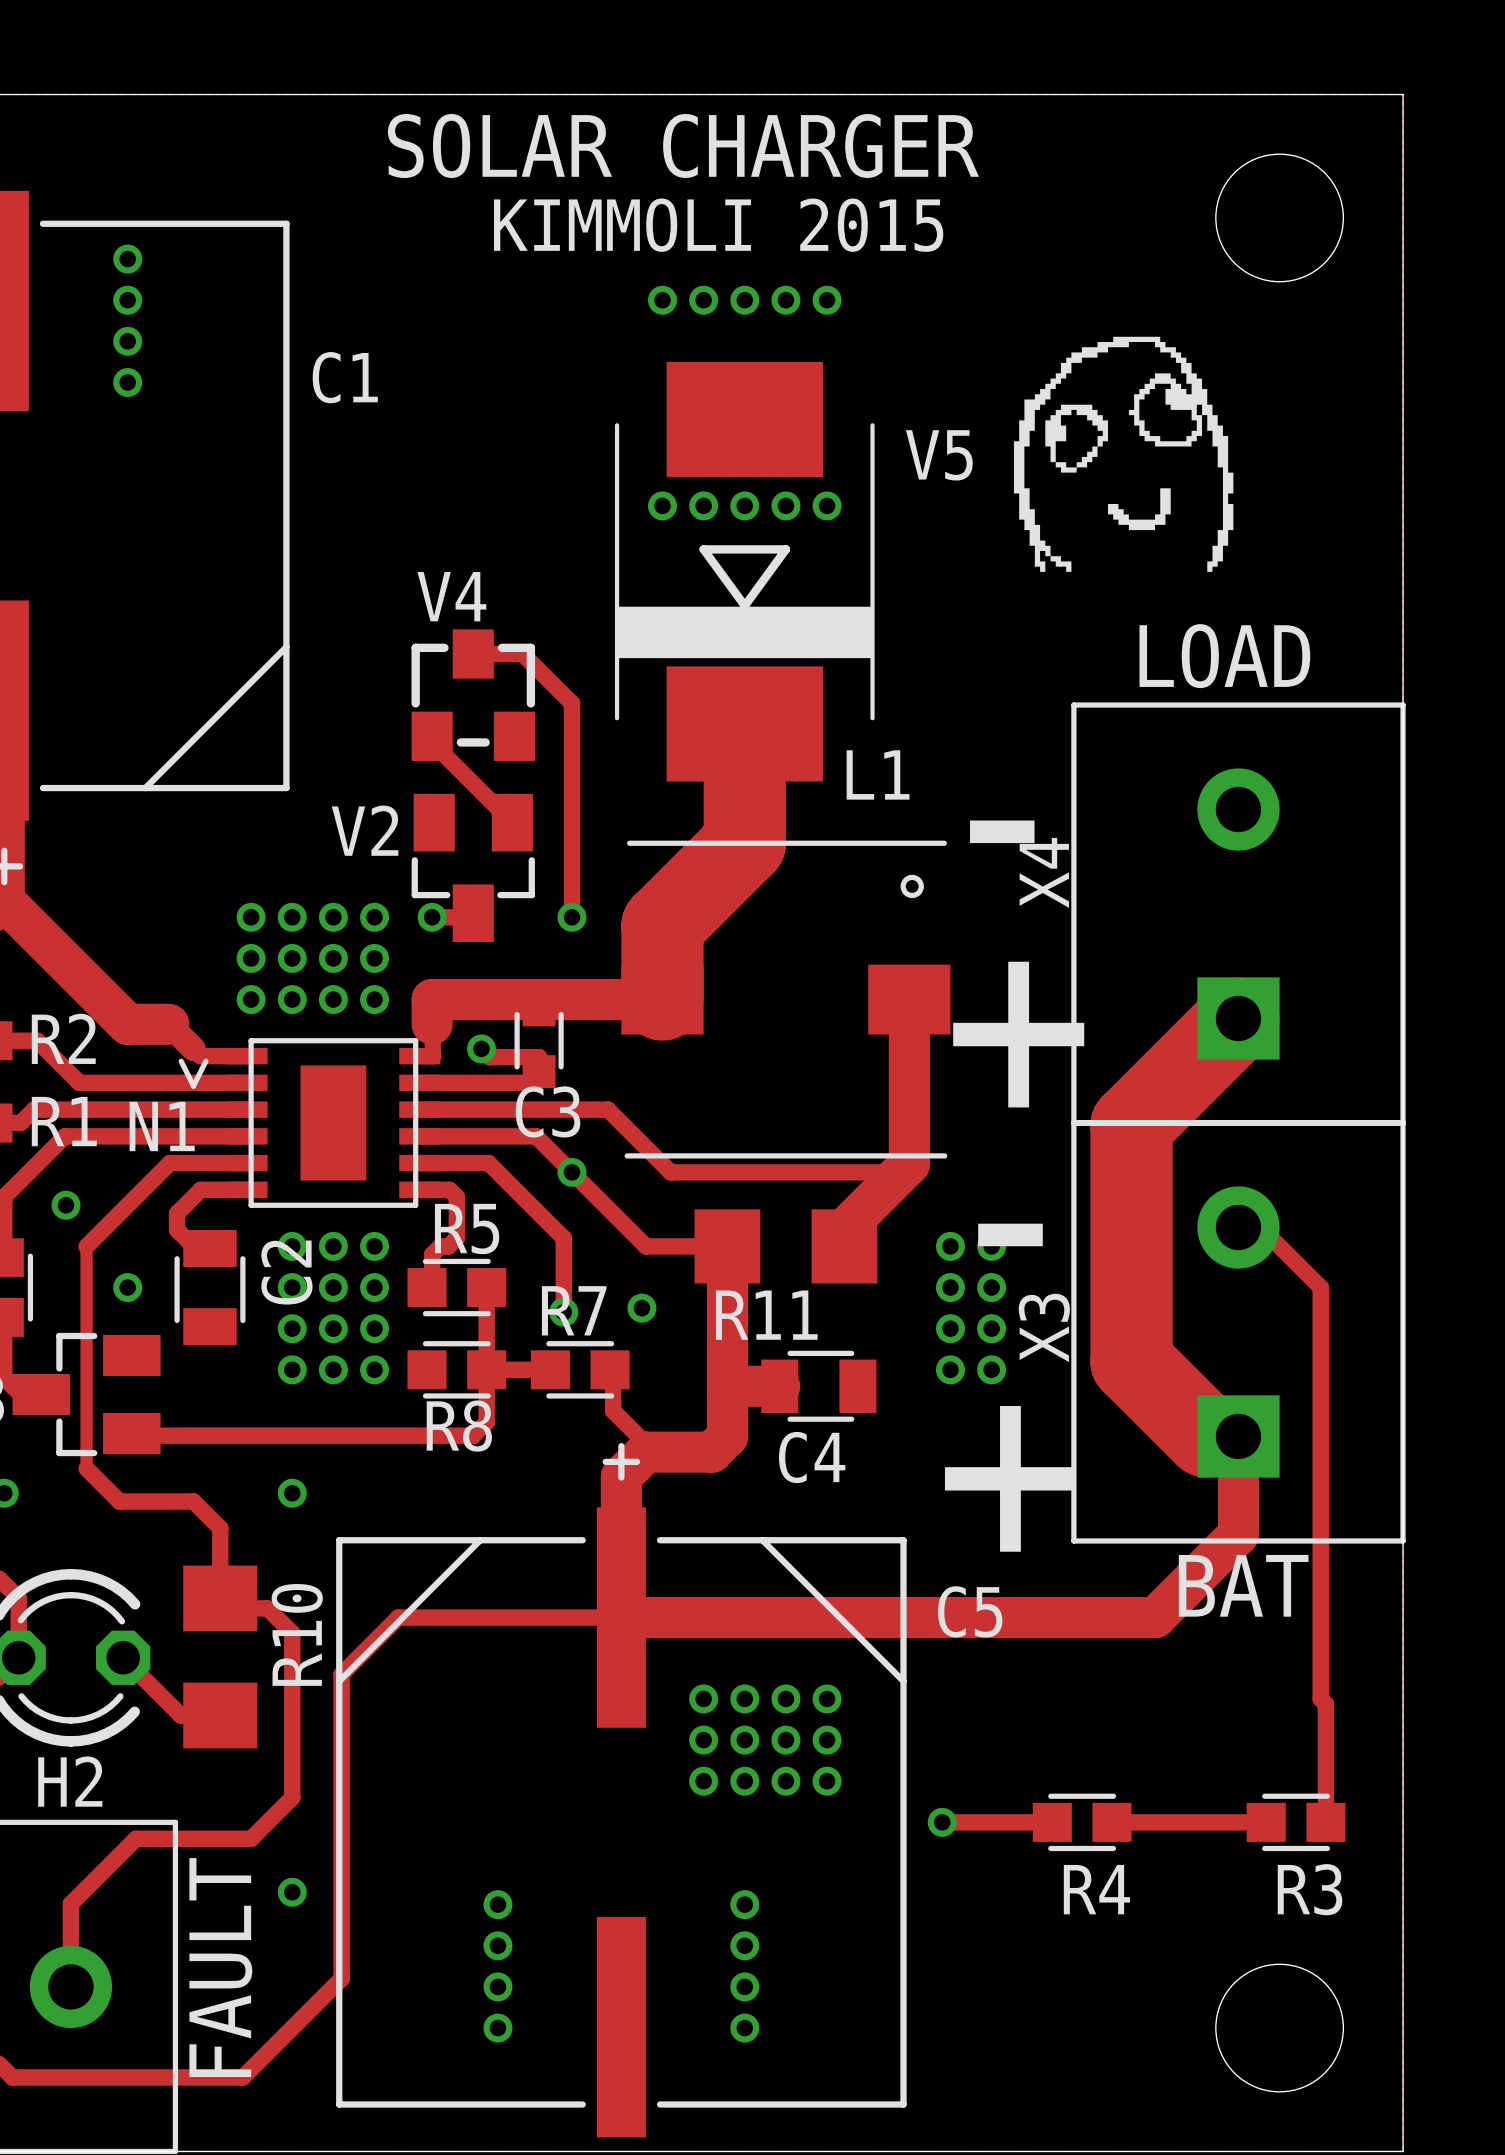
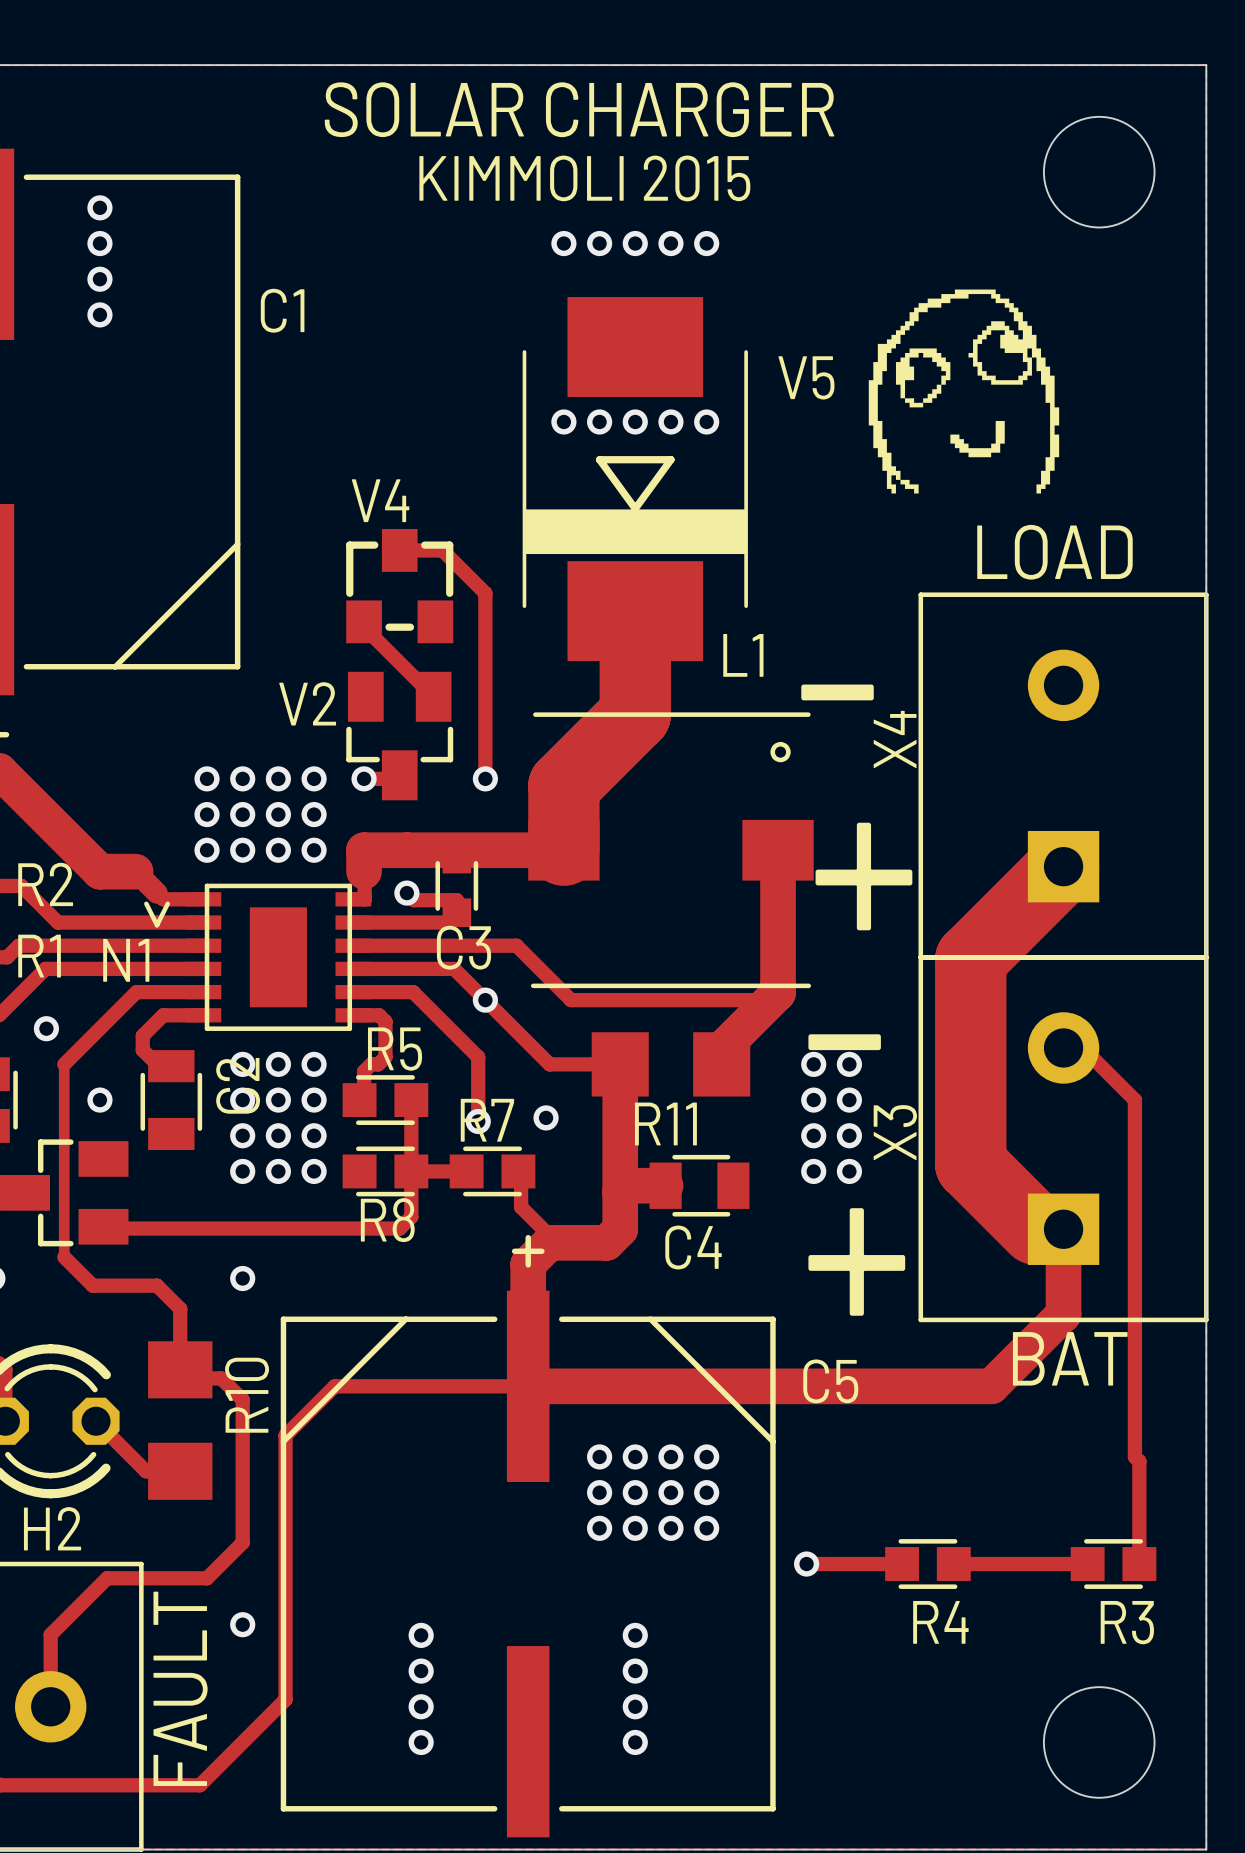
drawing position: (1123, 454) -> (963, 391)

